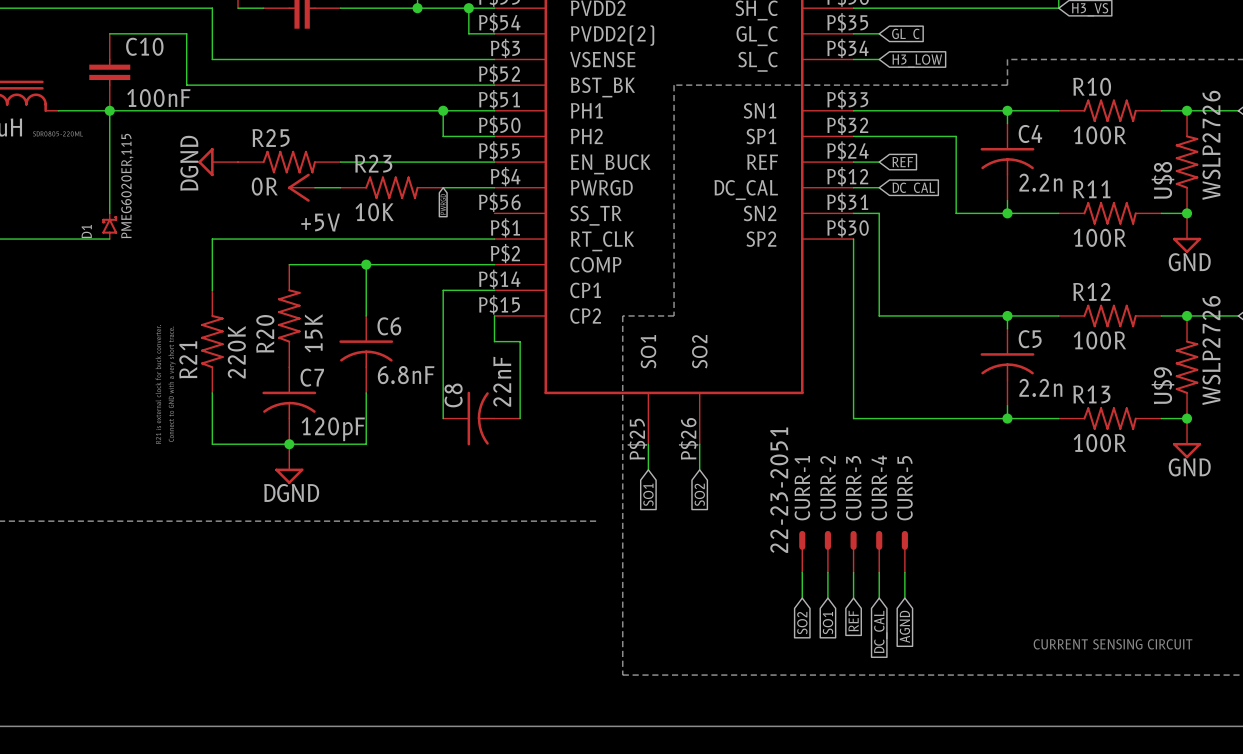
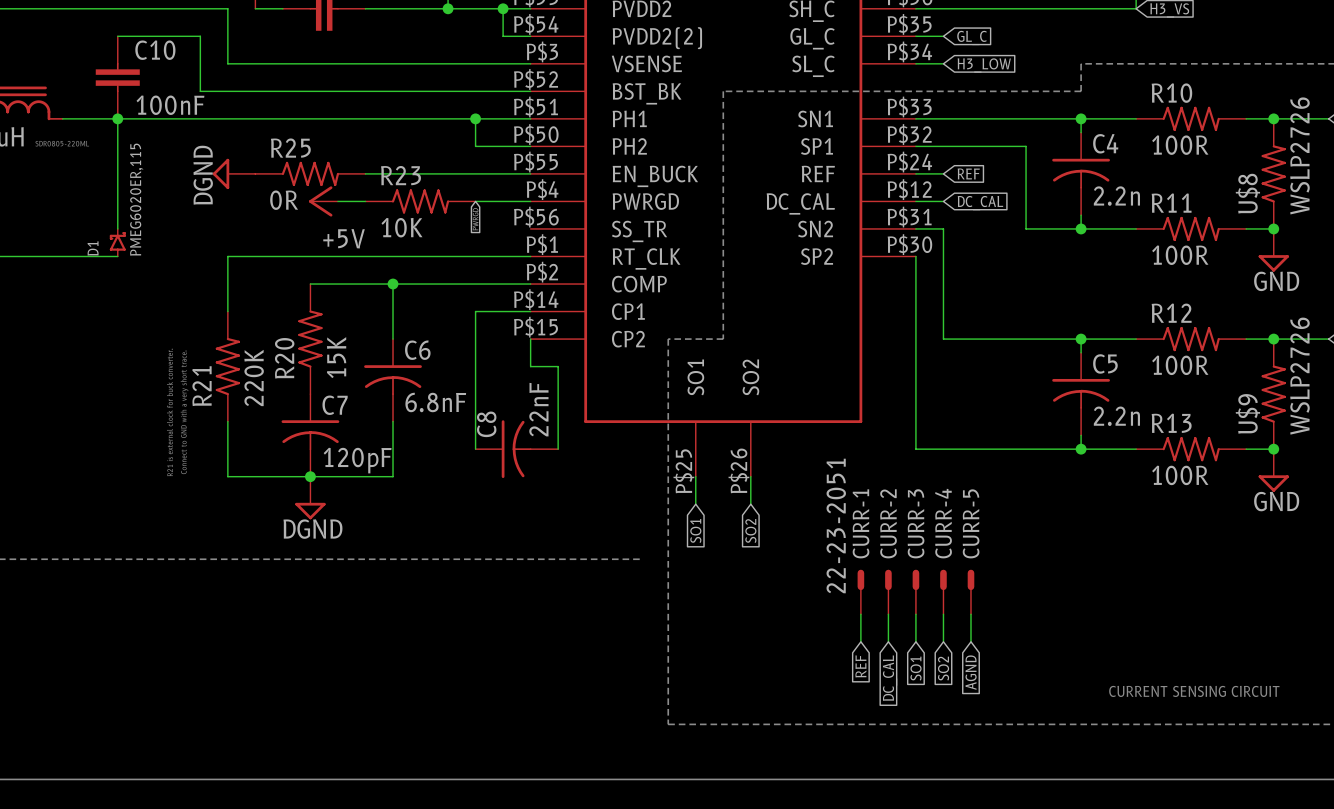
global label: REF (853, 621) -> SO1 (916, 668)
global label: SO2 (802, 623) -> REF (860, 666)
global label: SO1 (827, 623) -> DC_CAL (890, 678)
global label: DC_CAL (880, 631) -> SO2 (943, 668)

